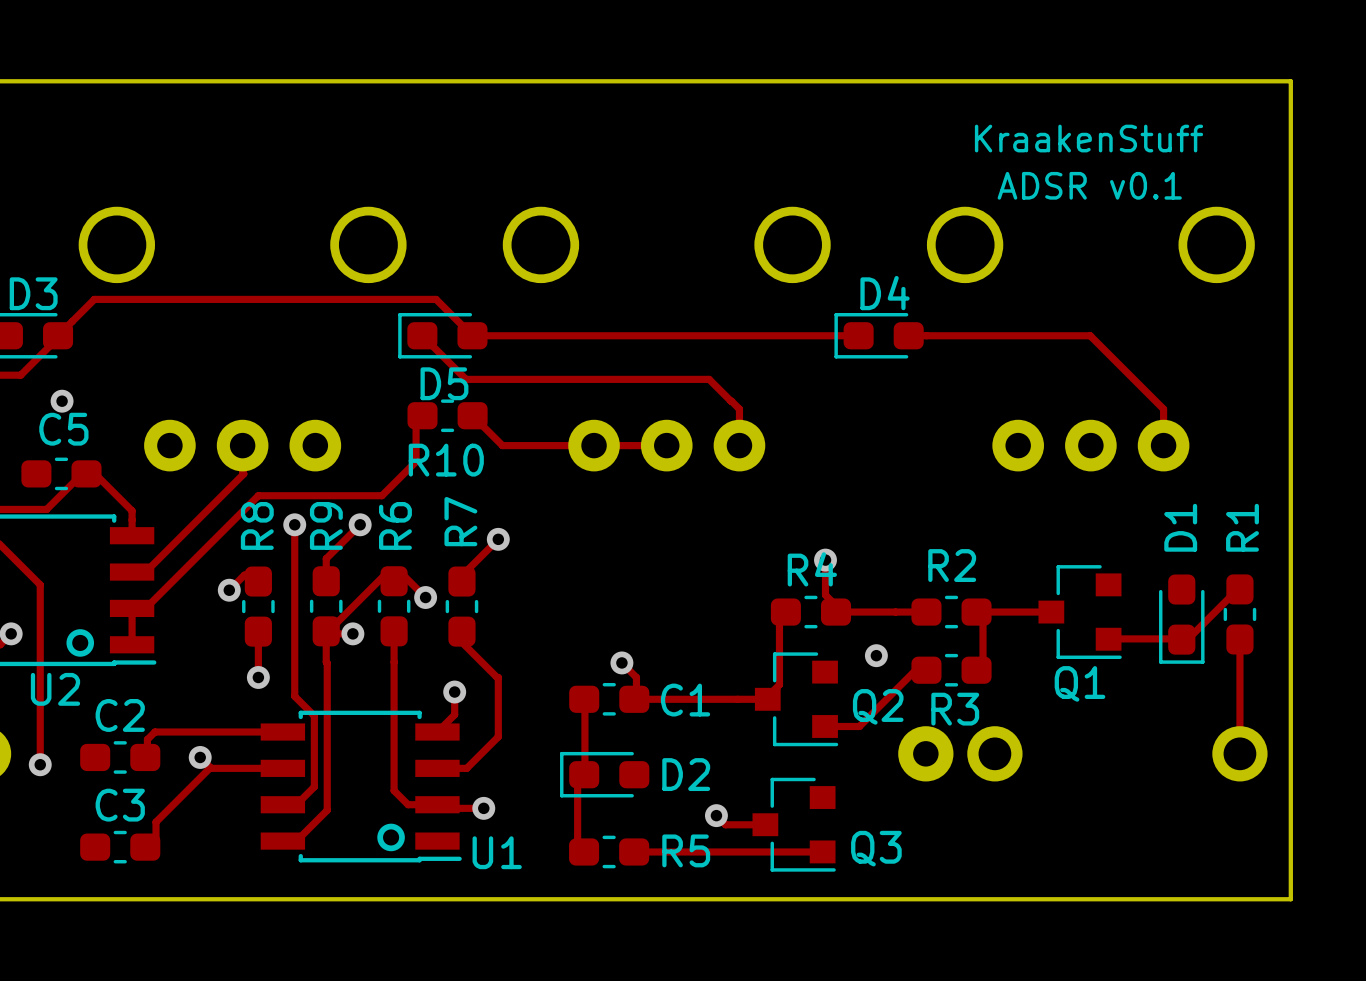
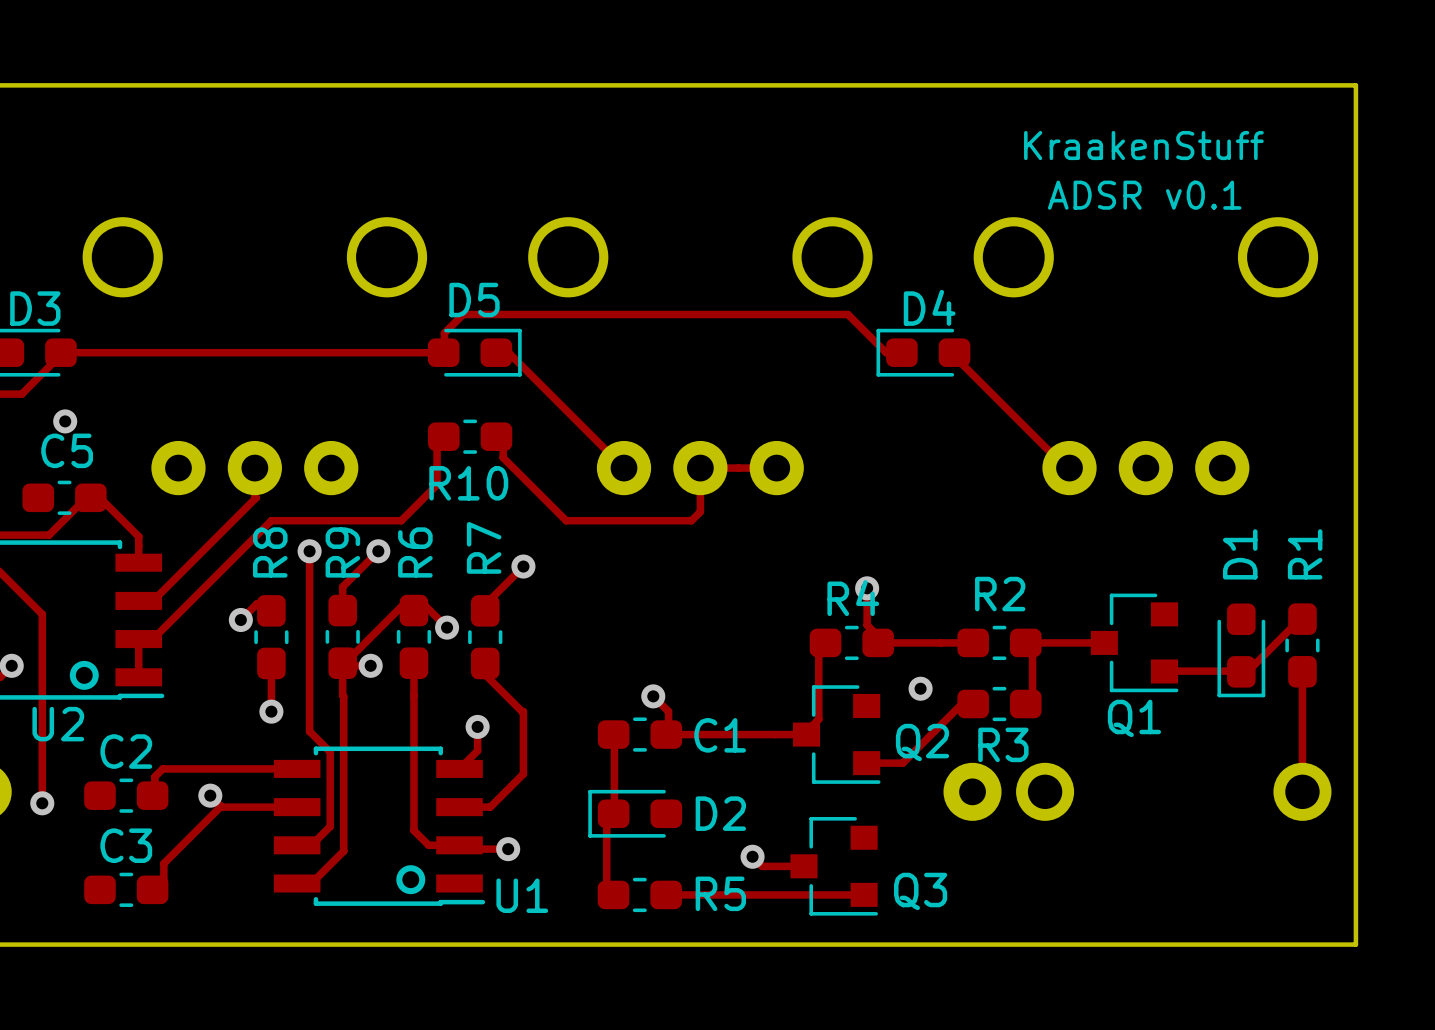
track: (58, 335) (94, 299) (436, 299) (472, 335) -> (60, 352) (444, 352) (444, 333) (463, 314) (847, 314) (886, 352)
track: (422, 335) (466, 379) (709, 379) (739, 409) (739, 445) -> (503, 436) (503, 457) (566, 520) (691, 520) (700, 511) (700, 468) (776, 468)
D5 rotation: 0° (442, 335) -> 180° (474, 352)
track: (484, 335) (843, 335) -> (508, 352) (624, 468)
track: (908, 335) (1090, 335) (1163, 409) (1163, 445) -> (953, 352) (953, 355) (1066, 468) (1069, 468)
track: (472, 415) (502, 445) (666, 445) -> none

